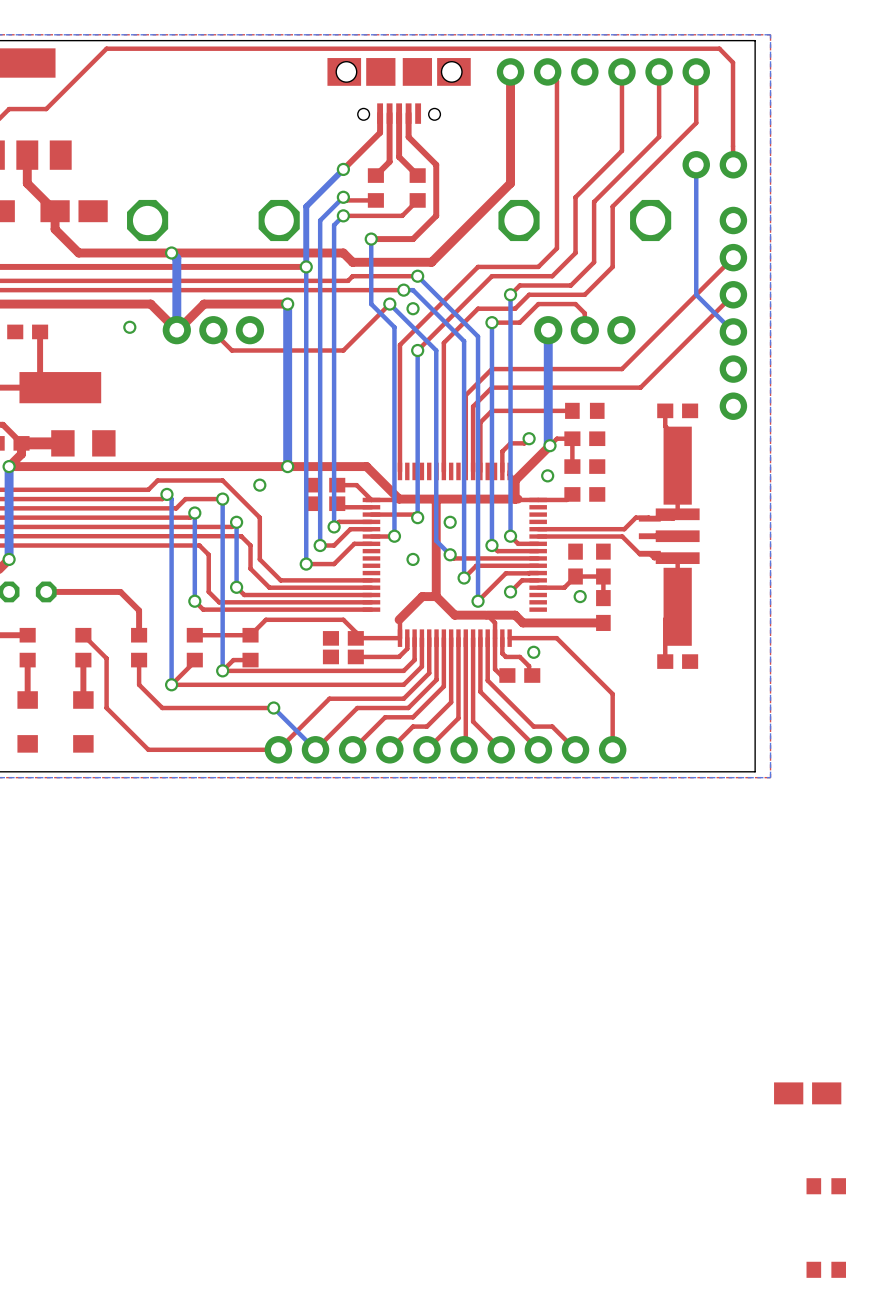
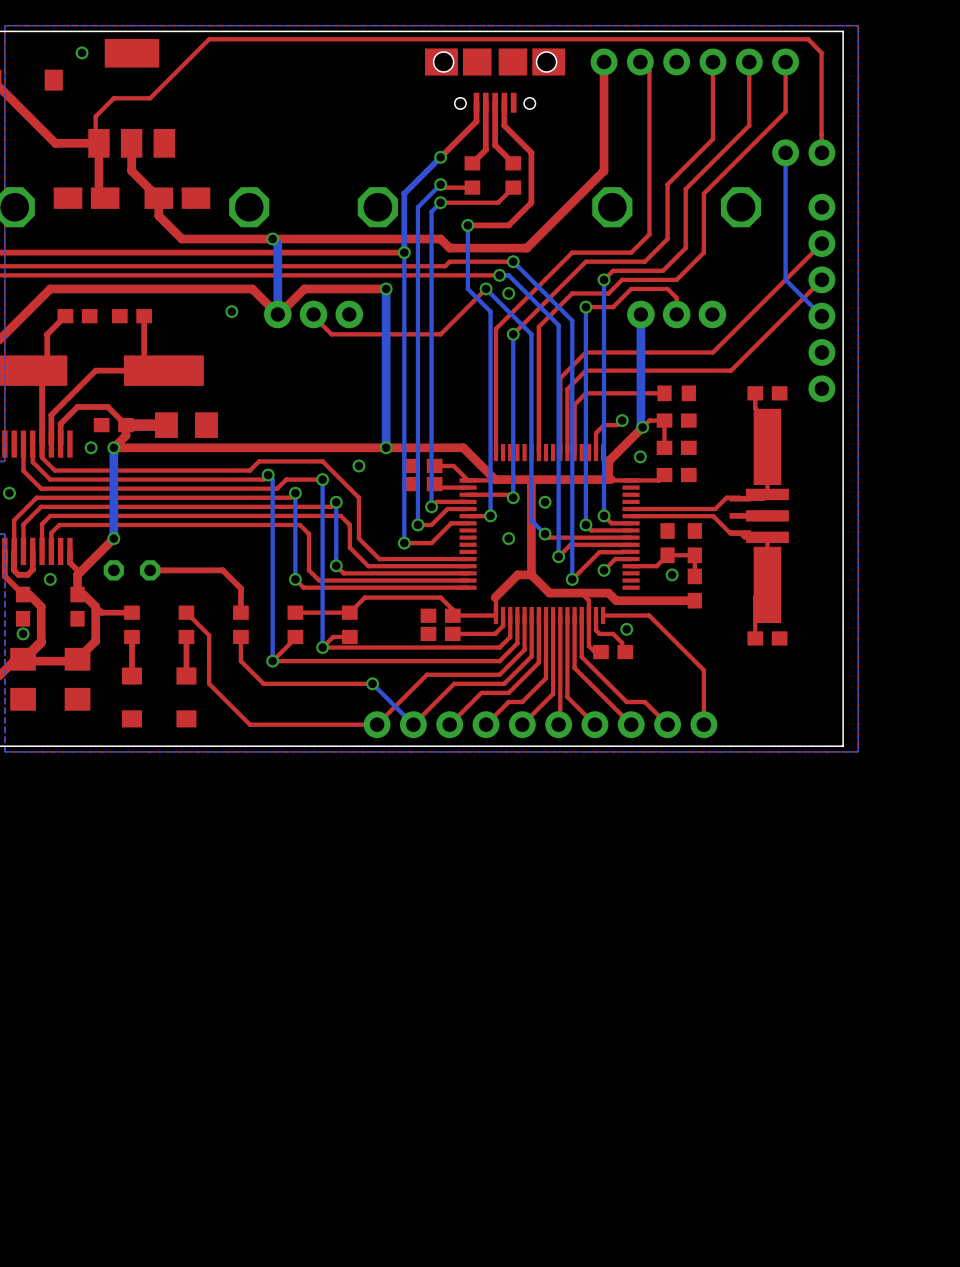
part: (807, 1093) -> none
part: (826, 1186) -> none
part: (826, 1269) -> none

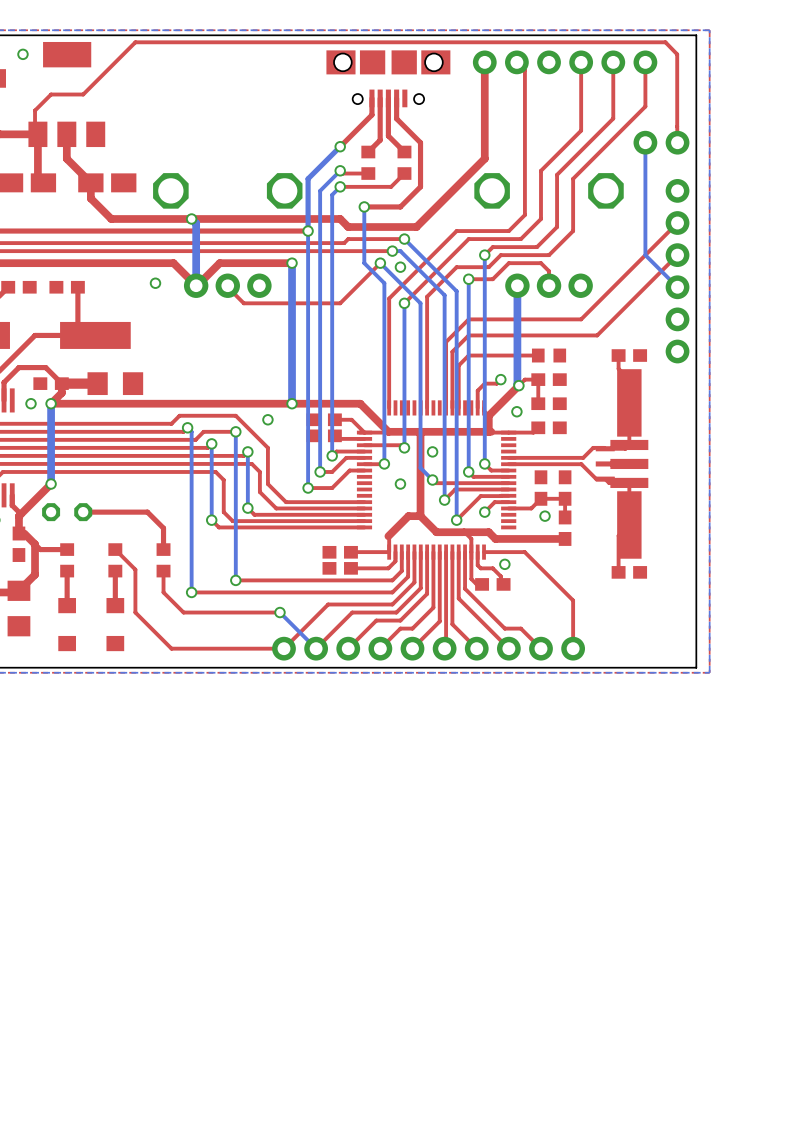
top track: (349, 612) (295, 612) -> none
top track: (349, 612) (364, 597) (440, 597) (452, 609) (452, 615) -> none
part: (295, 624) -> none
part: (349, 624) -> none
top track: (295, 636) (272, 661) -> none
top track: (349, 636) (333, 636) (322, 647) -> none

